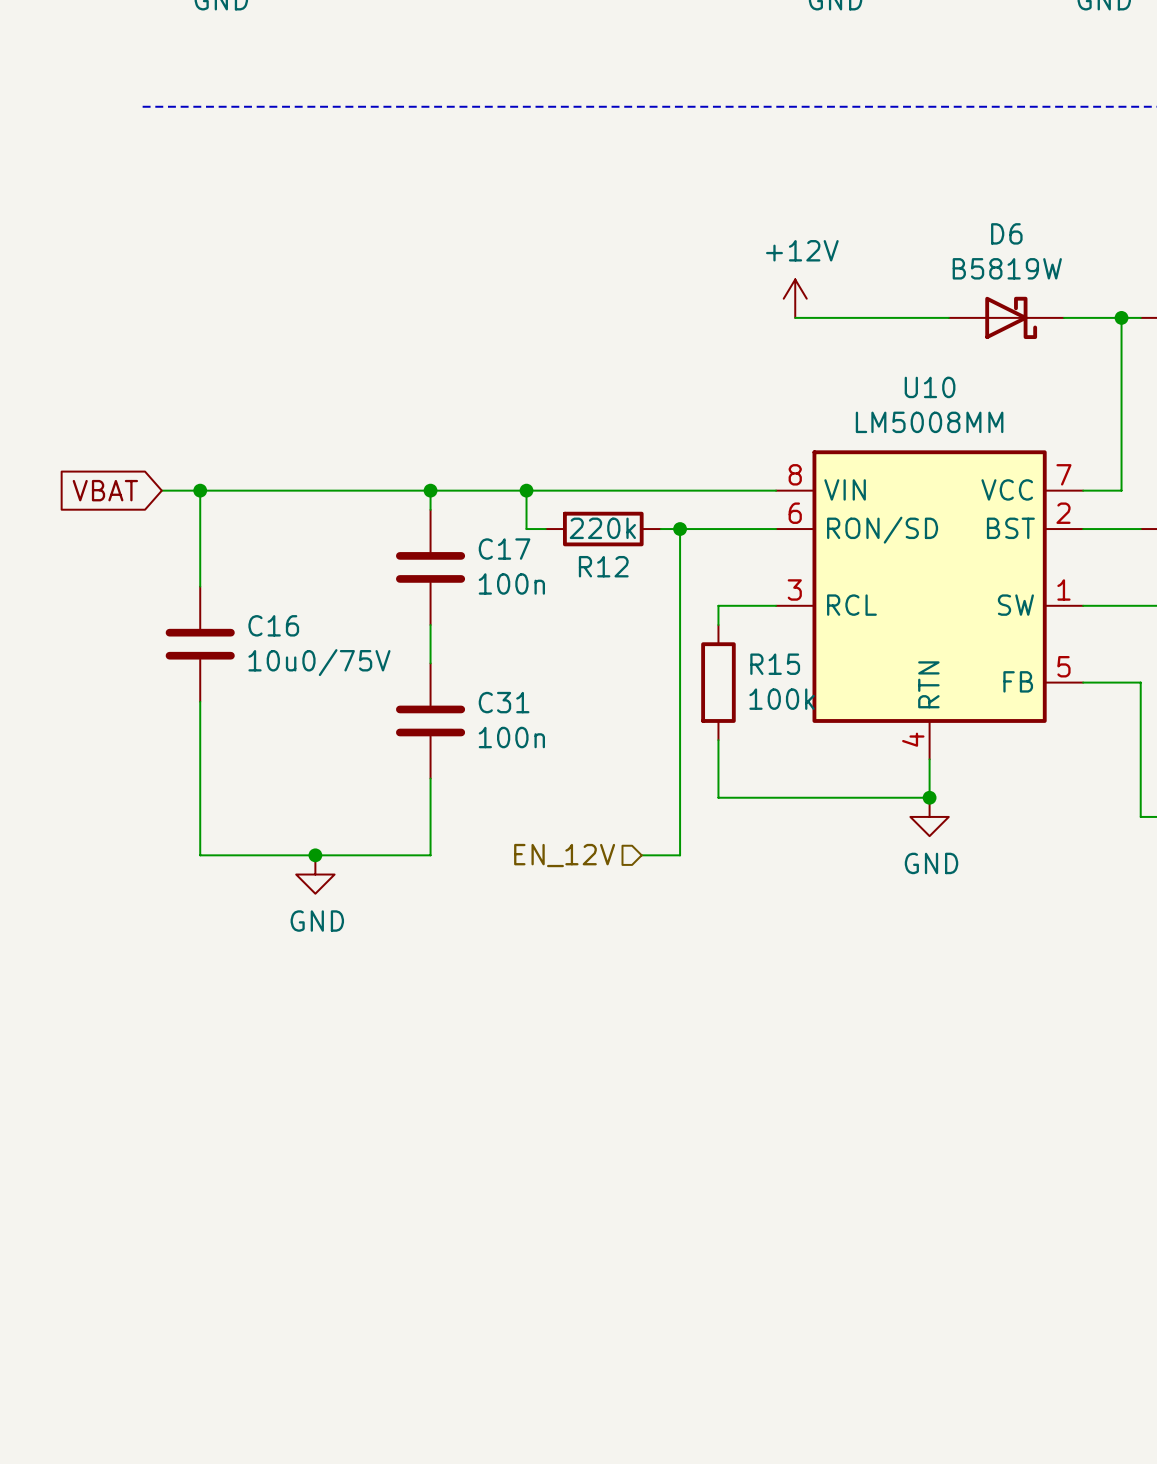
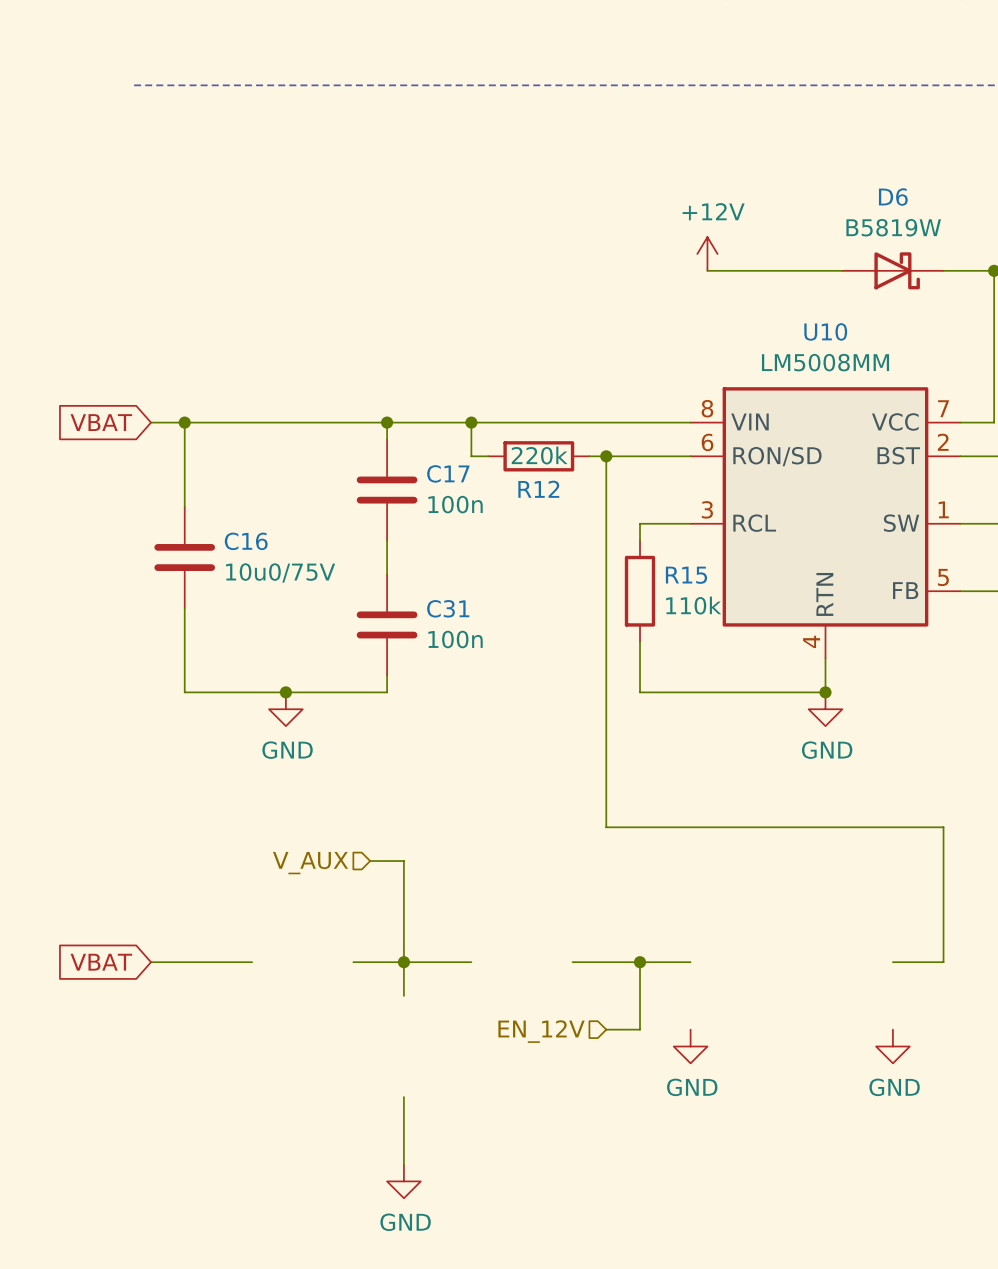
R15 value: 100k (782, 699) -> 110k (693, 605)
wire: (200, 797) (200, 855) (430, 855) (430, 797) -> (184, 692) (387, 692)
junction position: (315, 855) -> (285, 692)
hierarchical label position: EN_12V (564, 855) -> EN_12V (541, 1031)
wire: (641, 855) (680, 855) -> (892, 962) (943, 962) (943, 827) (606, 827) (606, 742)
power symbol position: GND (315, 874) -> GND (285, 709)
hierarchical label: none -> V_AUX (310, 863)
wire: none -> (370, 861) (403, 861) (403, 995)
global label: none -> VBAT (101, 962)
wire: none -> (150, 962) (252, 962)
wire: none -> (353, 962) (471, 962)
junction: none -> (403, 962)
wire: none -> (572, 962) (690, 962)
wire: none -> (640, 962) (640, 1029) (606, 1029)
junction: none -> (640, 962)
power symbol: none -> GND (690, 1046)
power symbol: none -> GND (892, 1046)
wire: none -> (403, 1097) (403, 1164)
power symbol: none -> GND (403, 1181)

